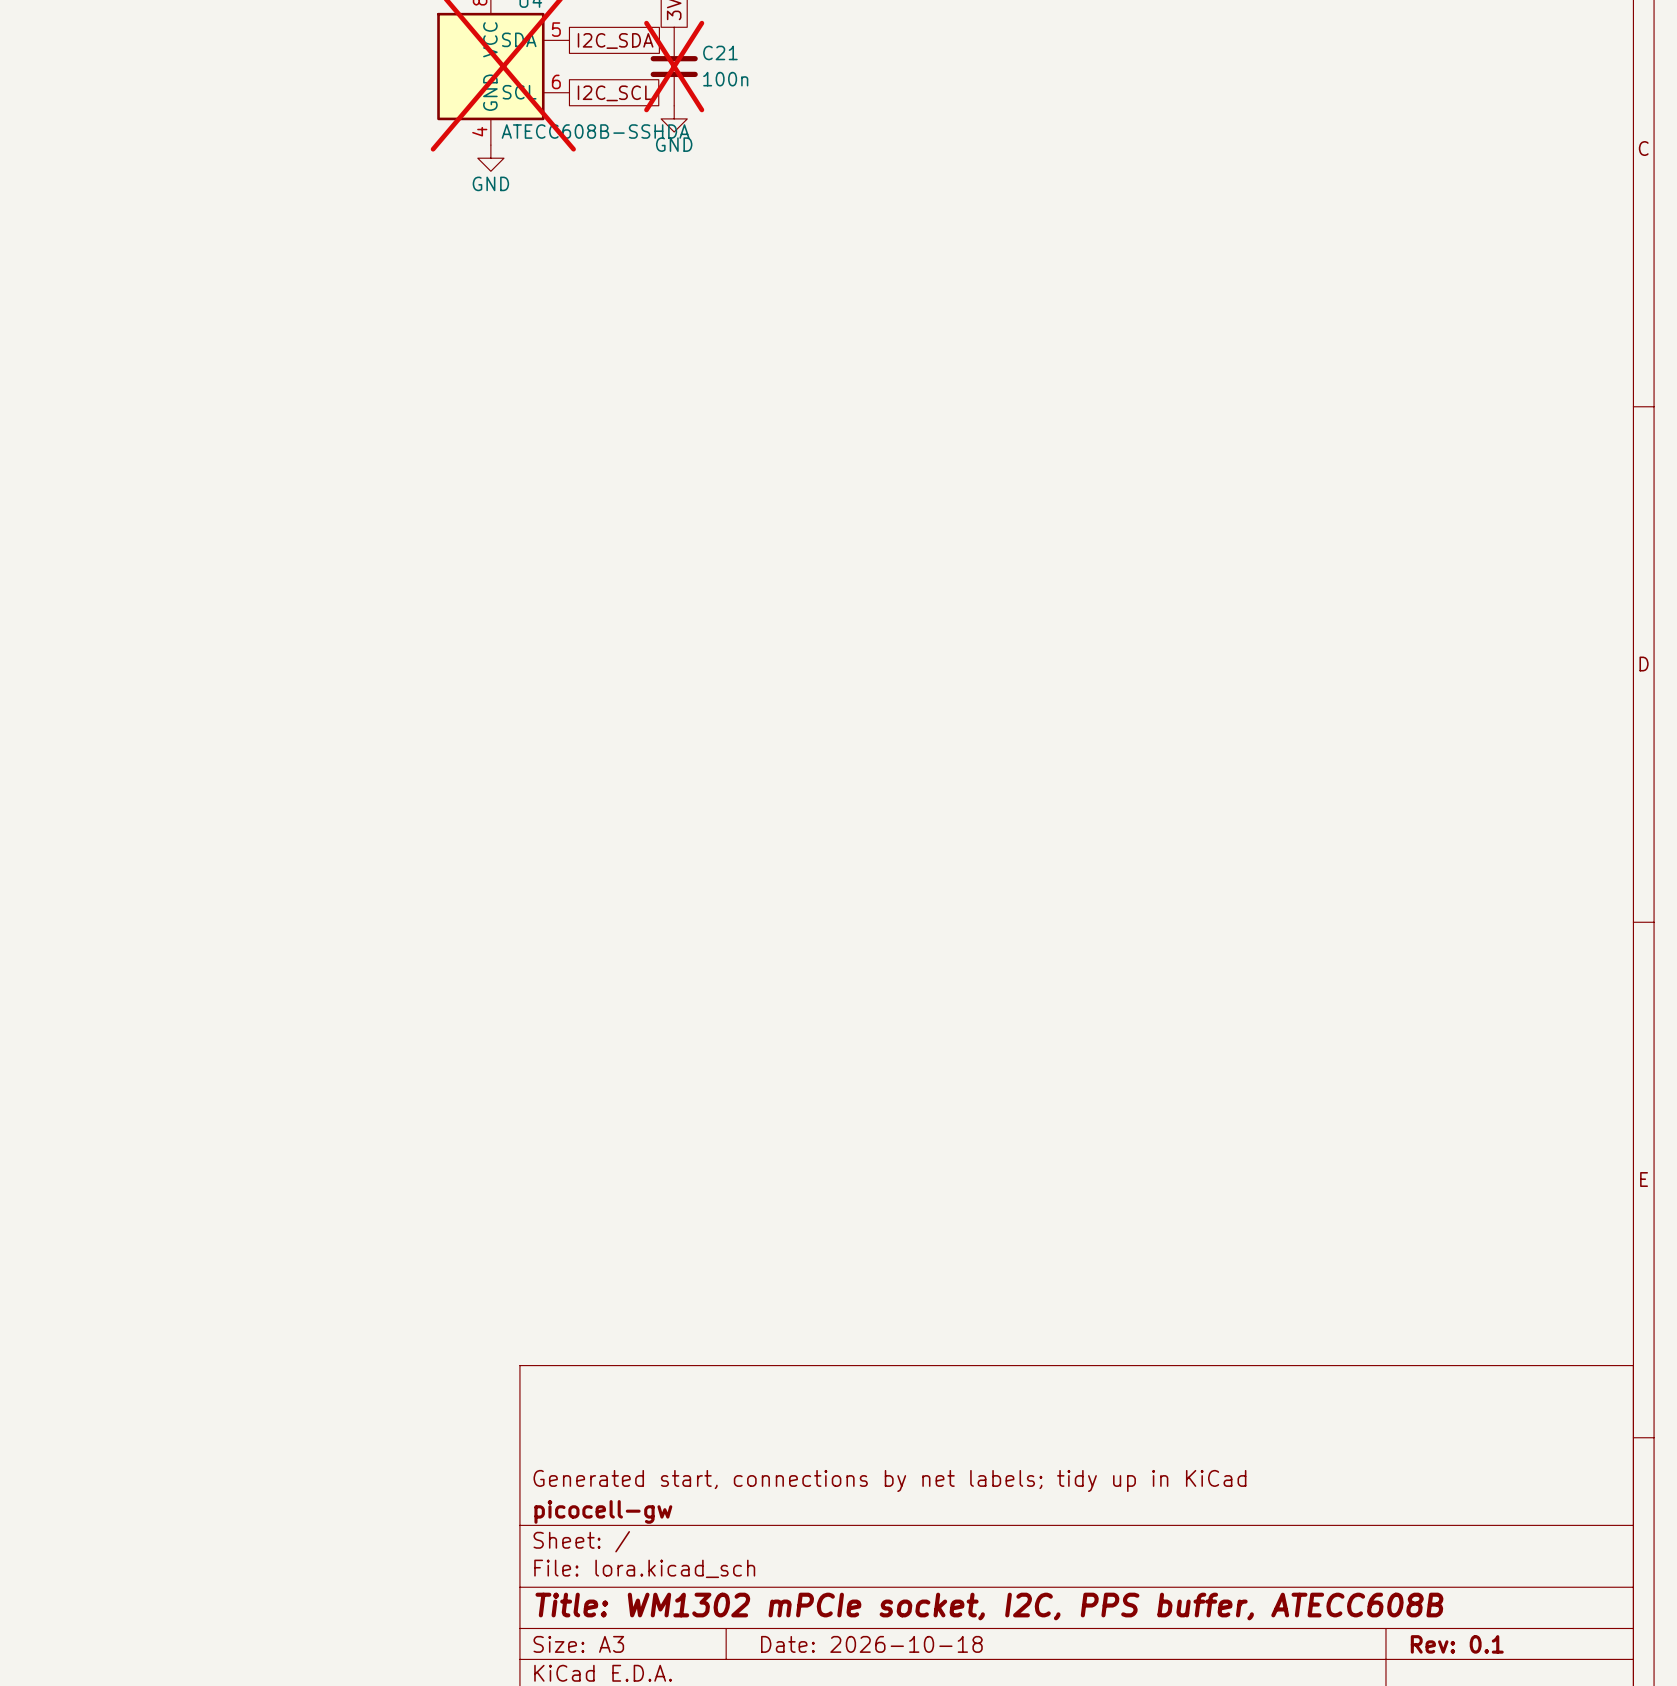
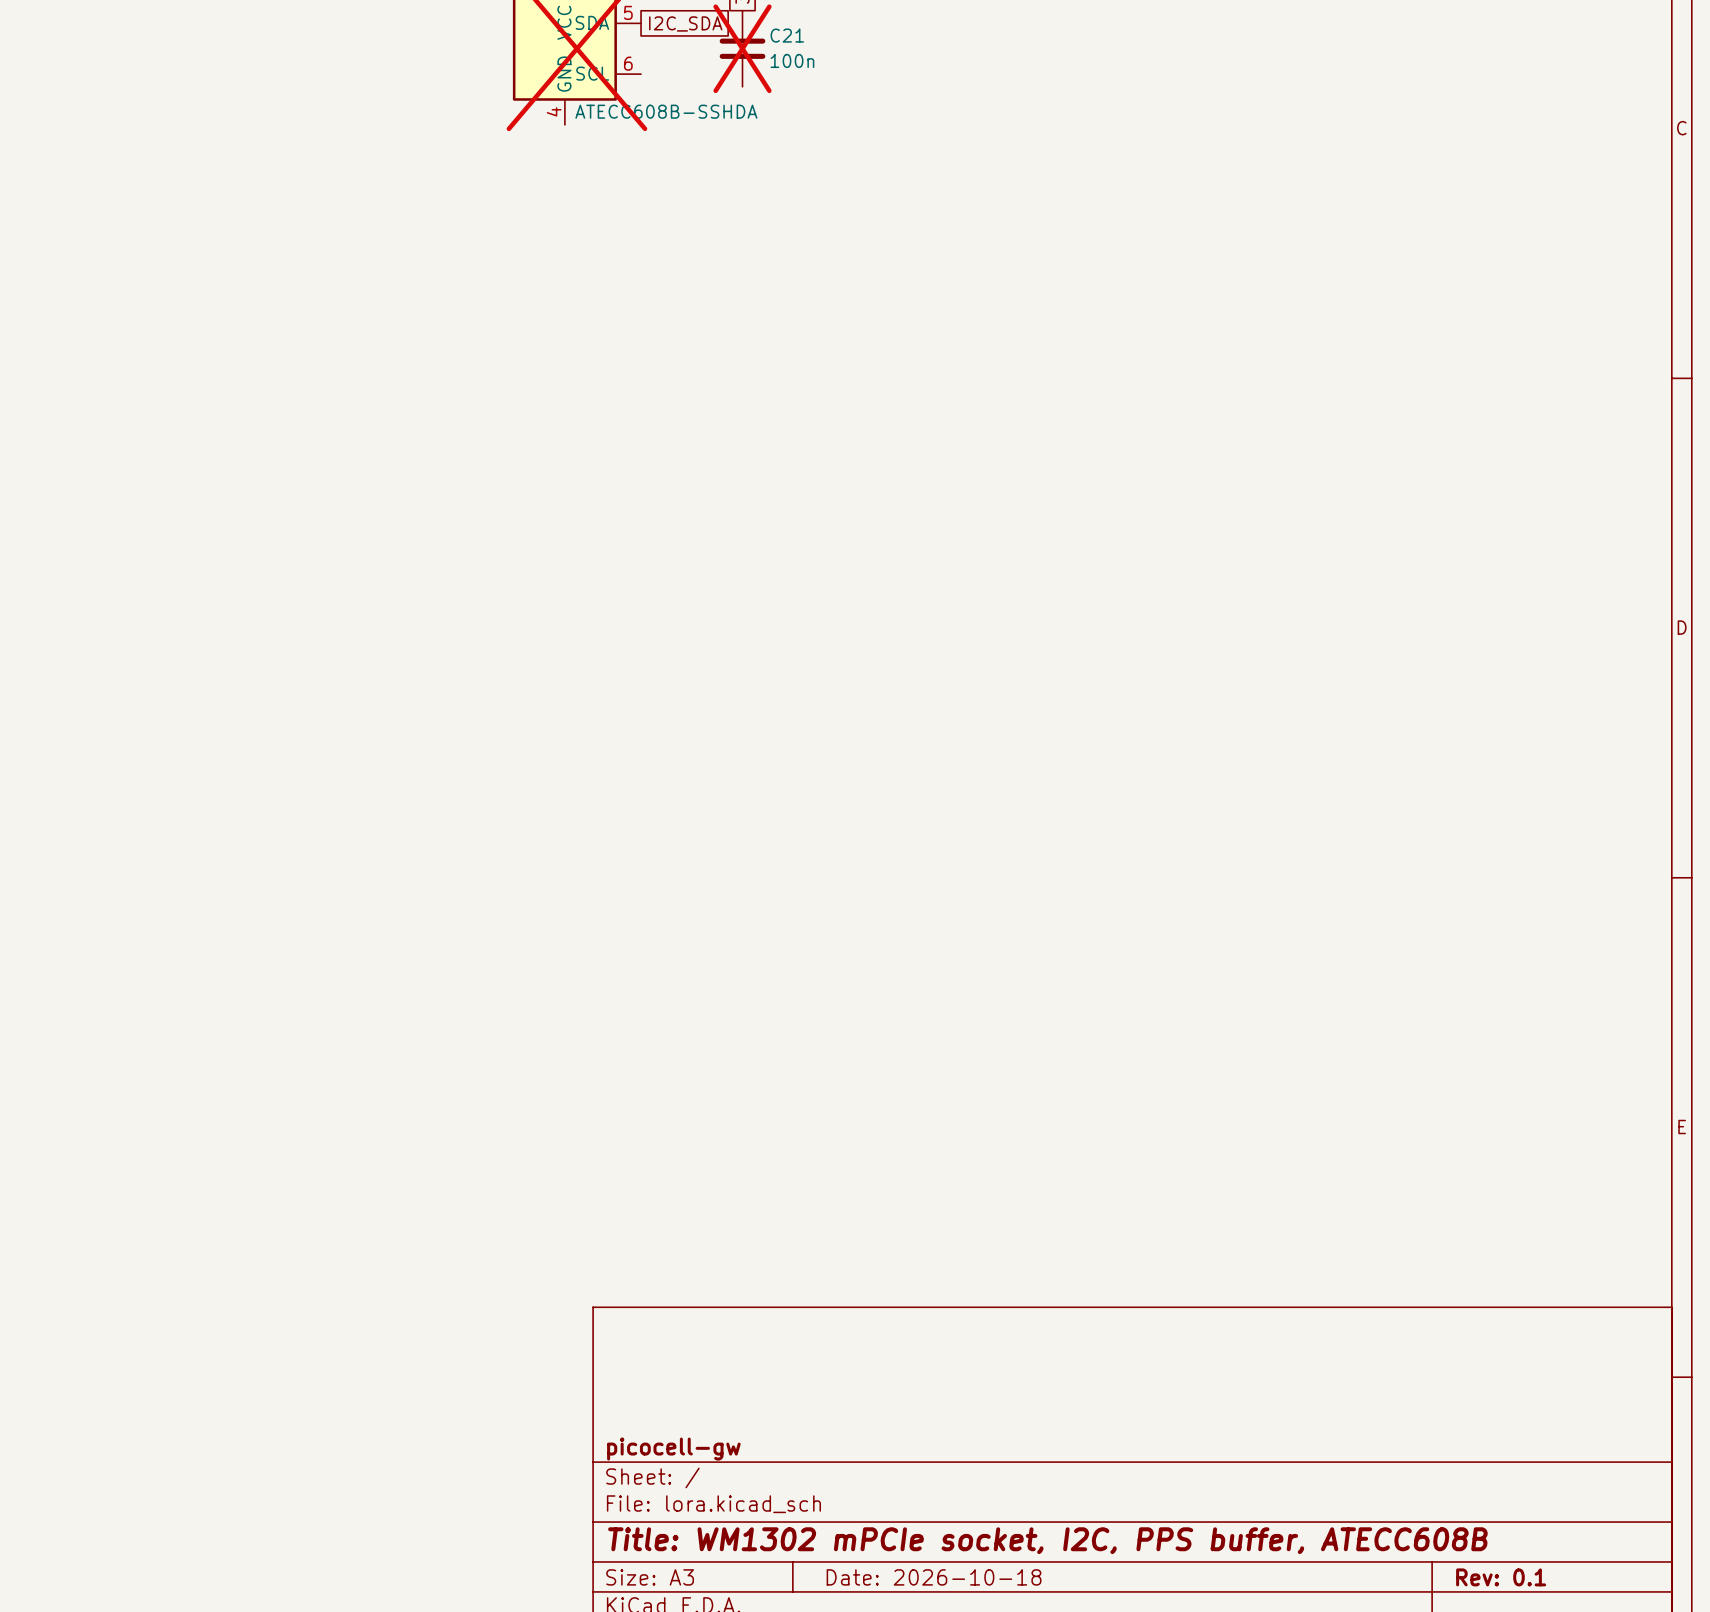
global label: I2C_SCL (615, 93) -> none
power symbol: GND (674, 118) -> none
power symbol: GND (490, 158) -> none
title block: Generated start, connections by net labels; tidy up in KiCad (889, 1480) -> none

